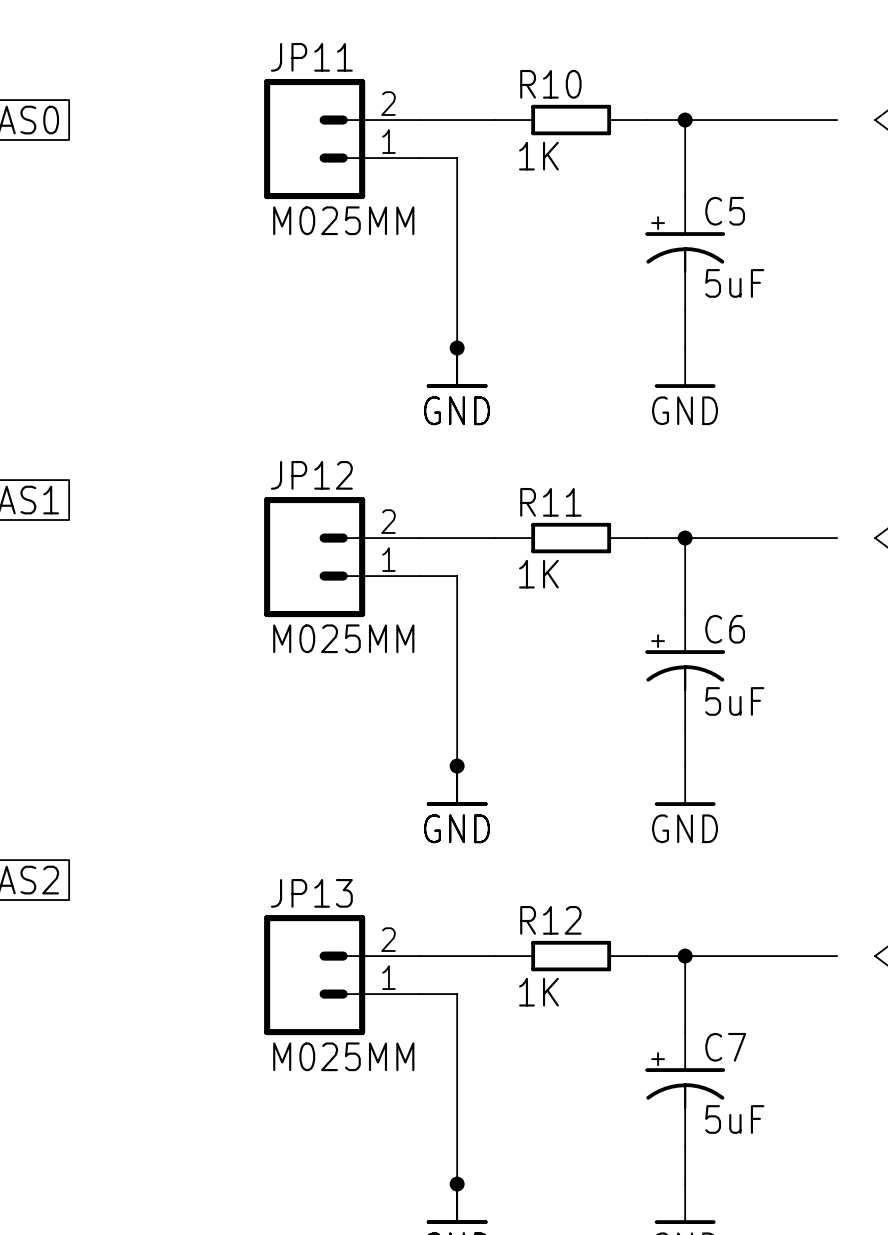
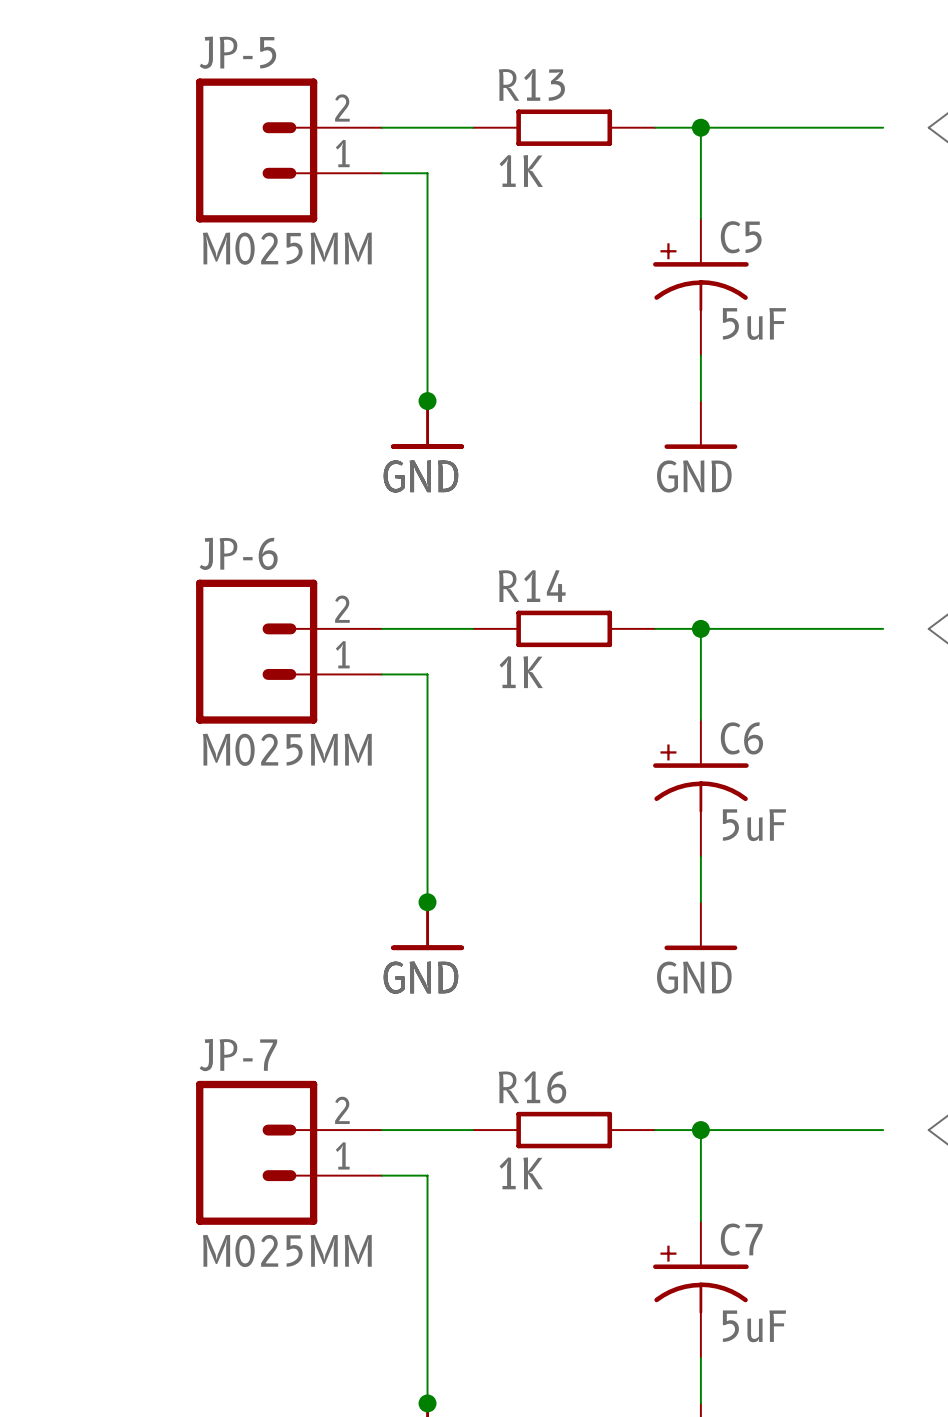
JP11 name: JP11 (311, 57) -> JP-5 (237, 52)
R10 name: R10 (550, 84) -> R13 (531, 84)
JP12 name: JP12 (311, 475) -> JP-6 (238, 553)
R11 name: R11 (550, 502) -> R14 (532, 586)
JP13 name: JP13 (311, 893) -> JP-7 (238, 1055)
R12 name: R12 (550, 920) -> R16 (532, 1087)

